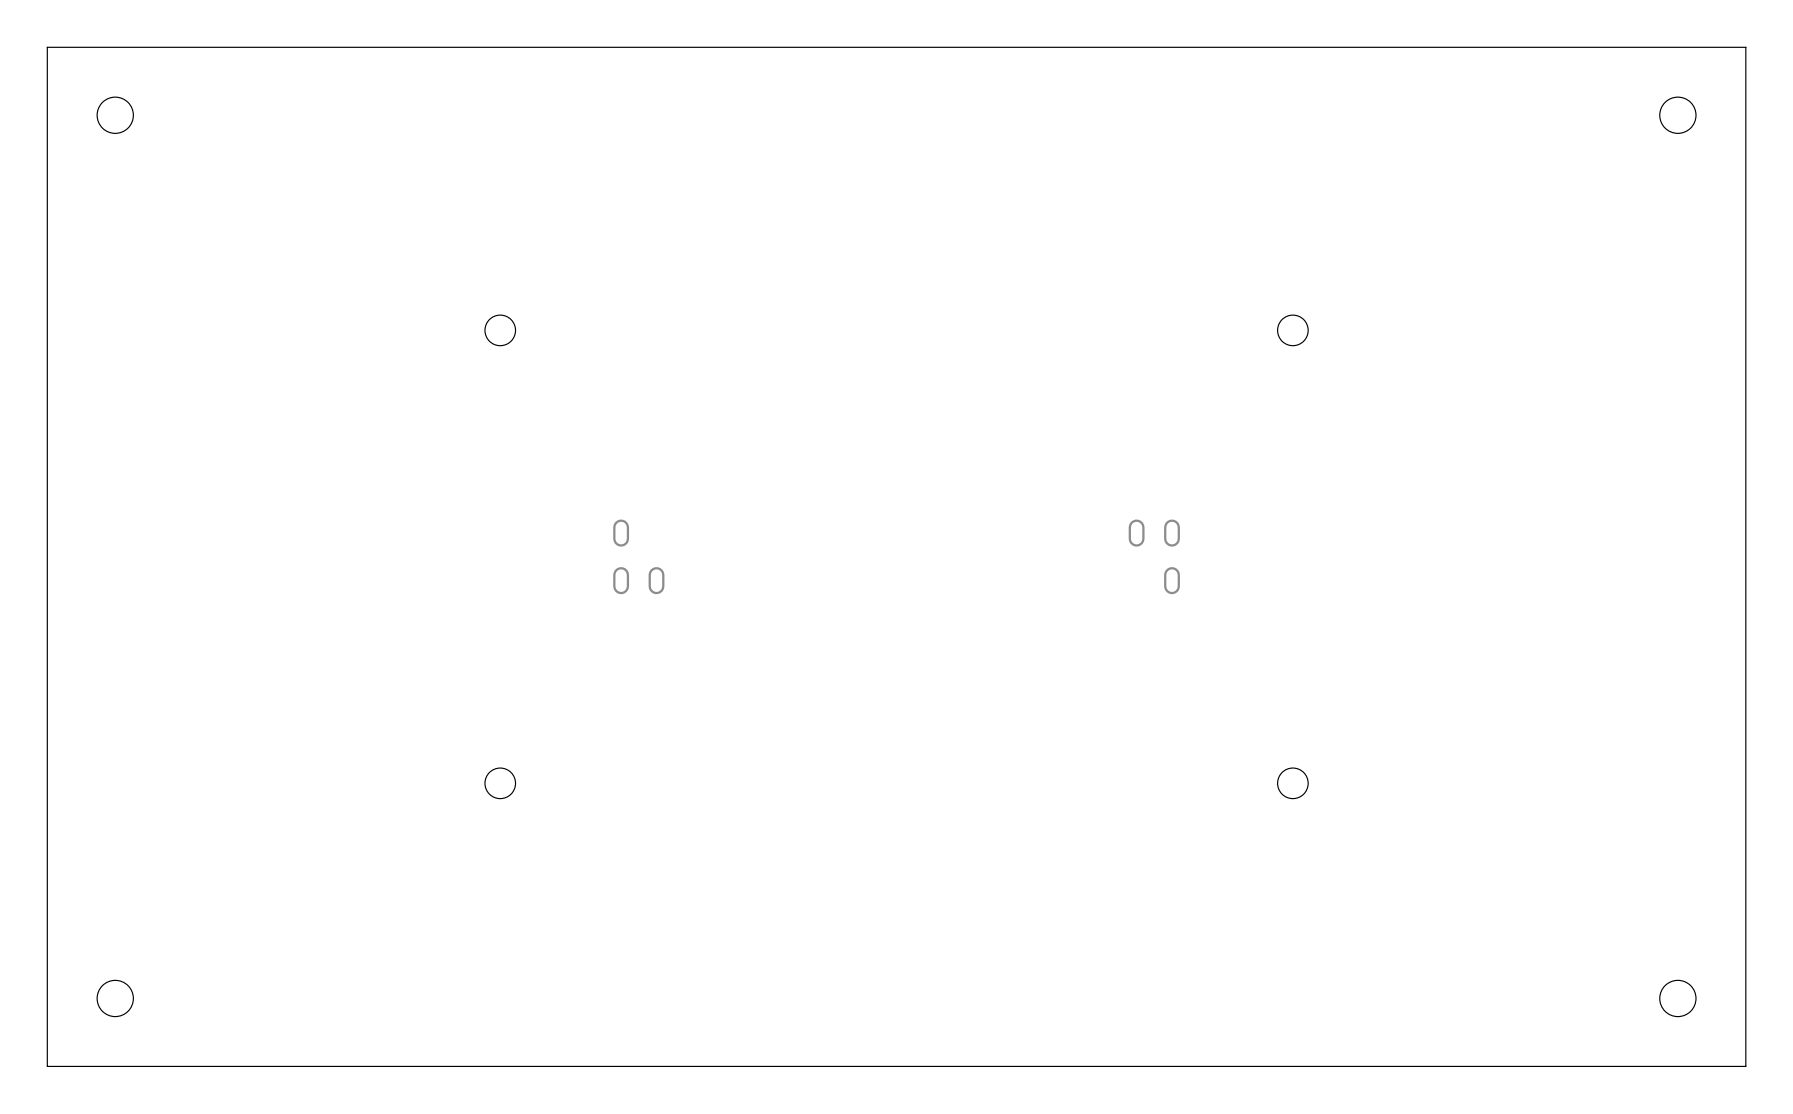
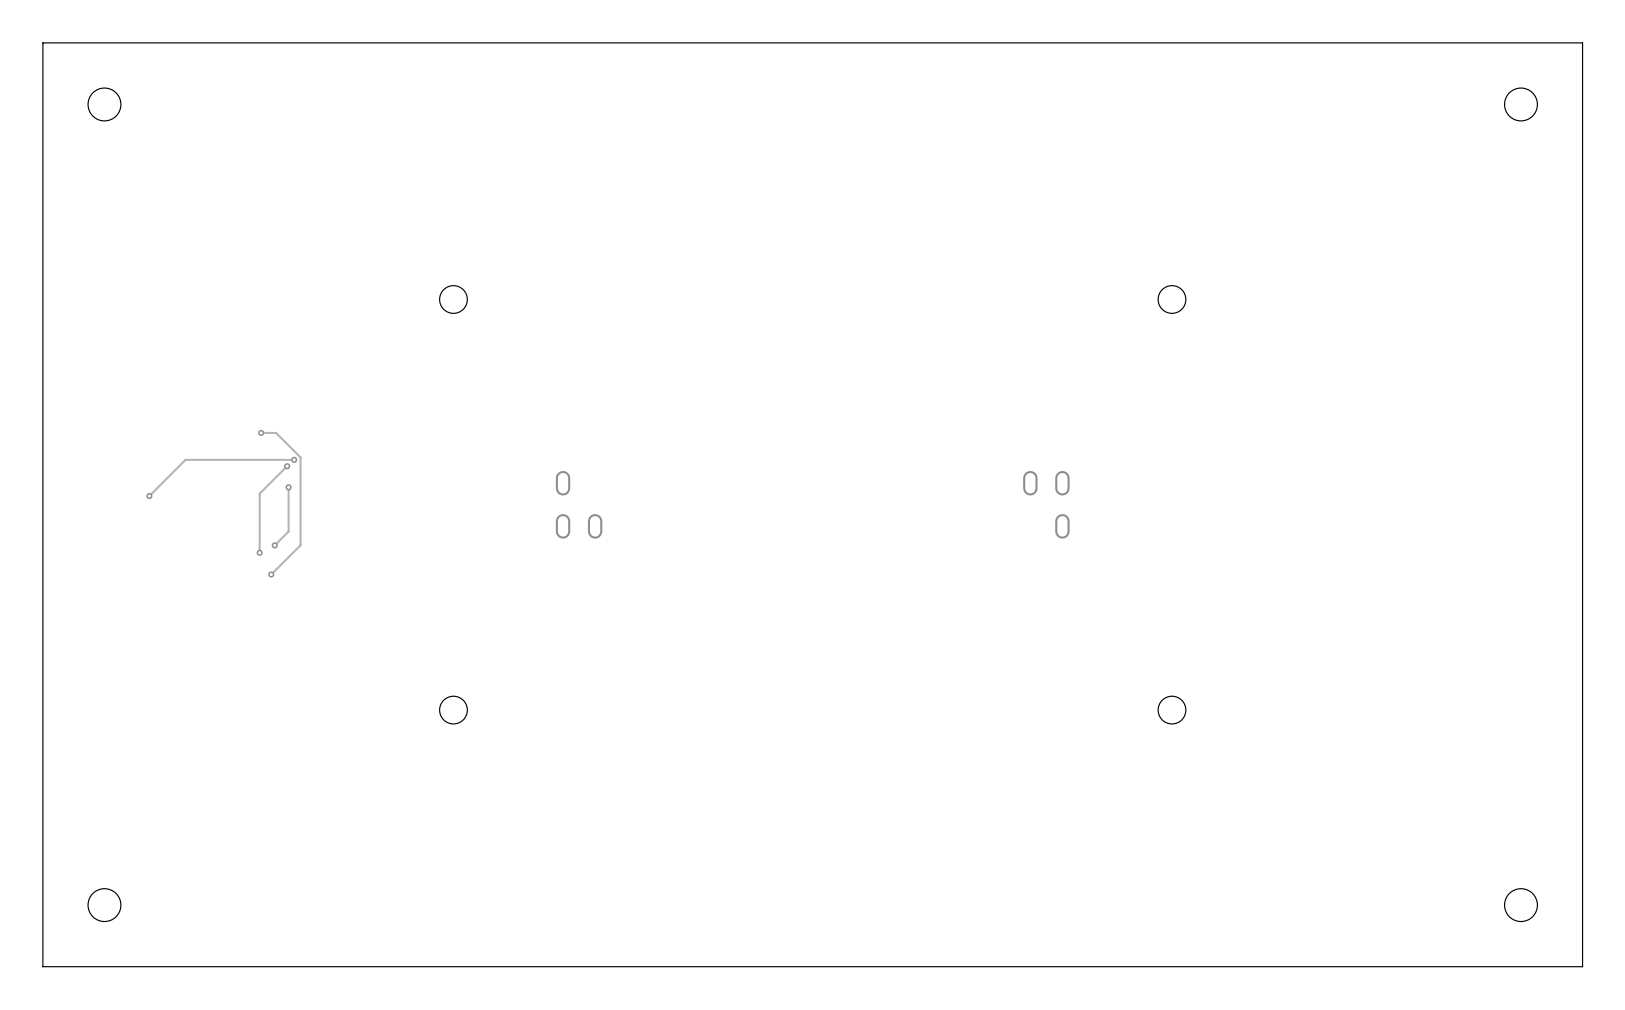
track: none -> (261, 432) (276, 432) (300, 457) (300, 545) (271, 574)
via: none -> (261, 432)
track: none -> (294, 459) (185, 459) (149, 496)
via: none -> (294, 459)
track: none -> (287, 466) (259, 493) (259, 552)
via: none -> (287, 466)
track: none -> (288, 487) (288, 531) (274, 545)
via: none -> (288, 487)
via: none -> (149, 496)
via: none -> (274, 545)
via: none -> (259, 552)
via: none -> (271, 574)

